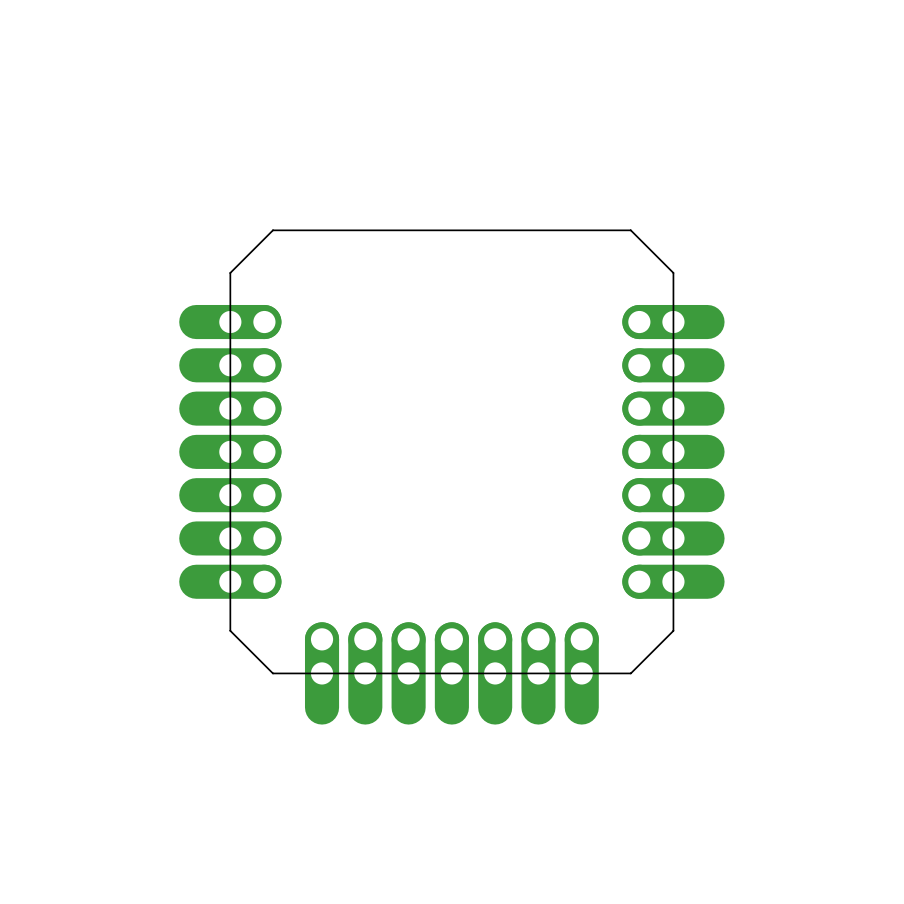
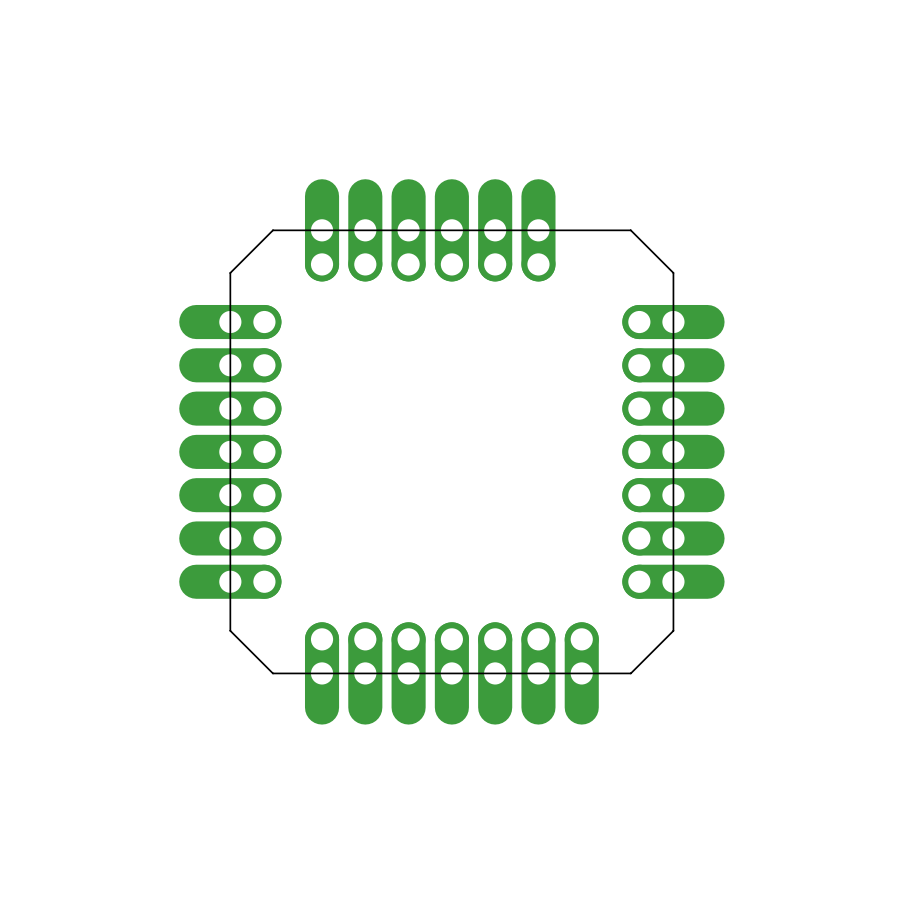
part: none -> (430, 230)

